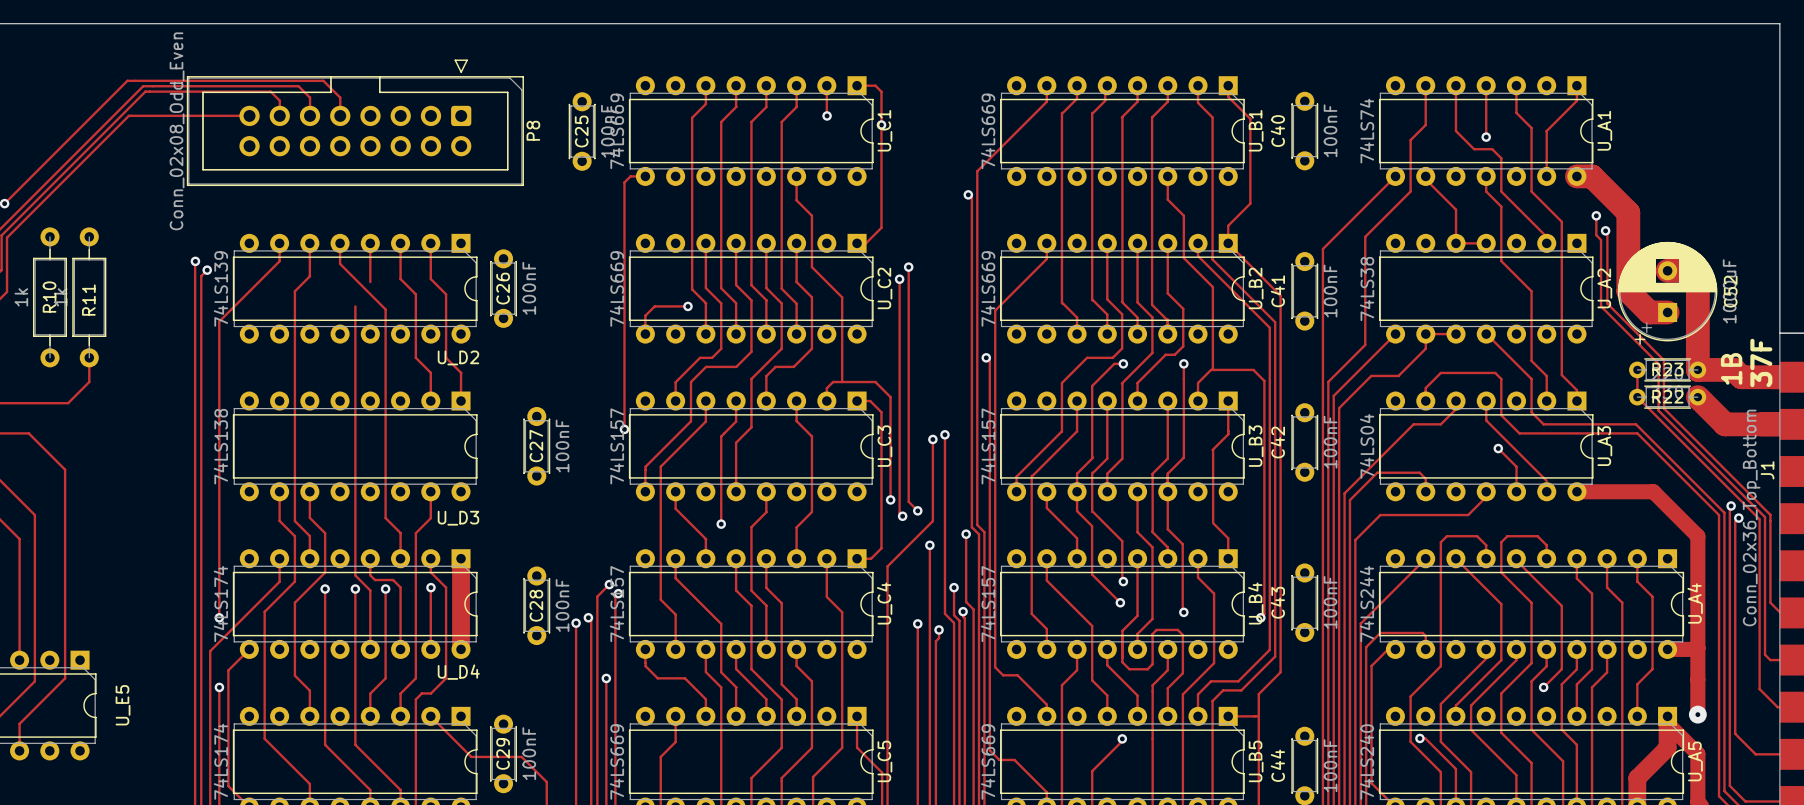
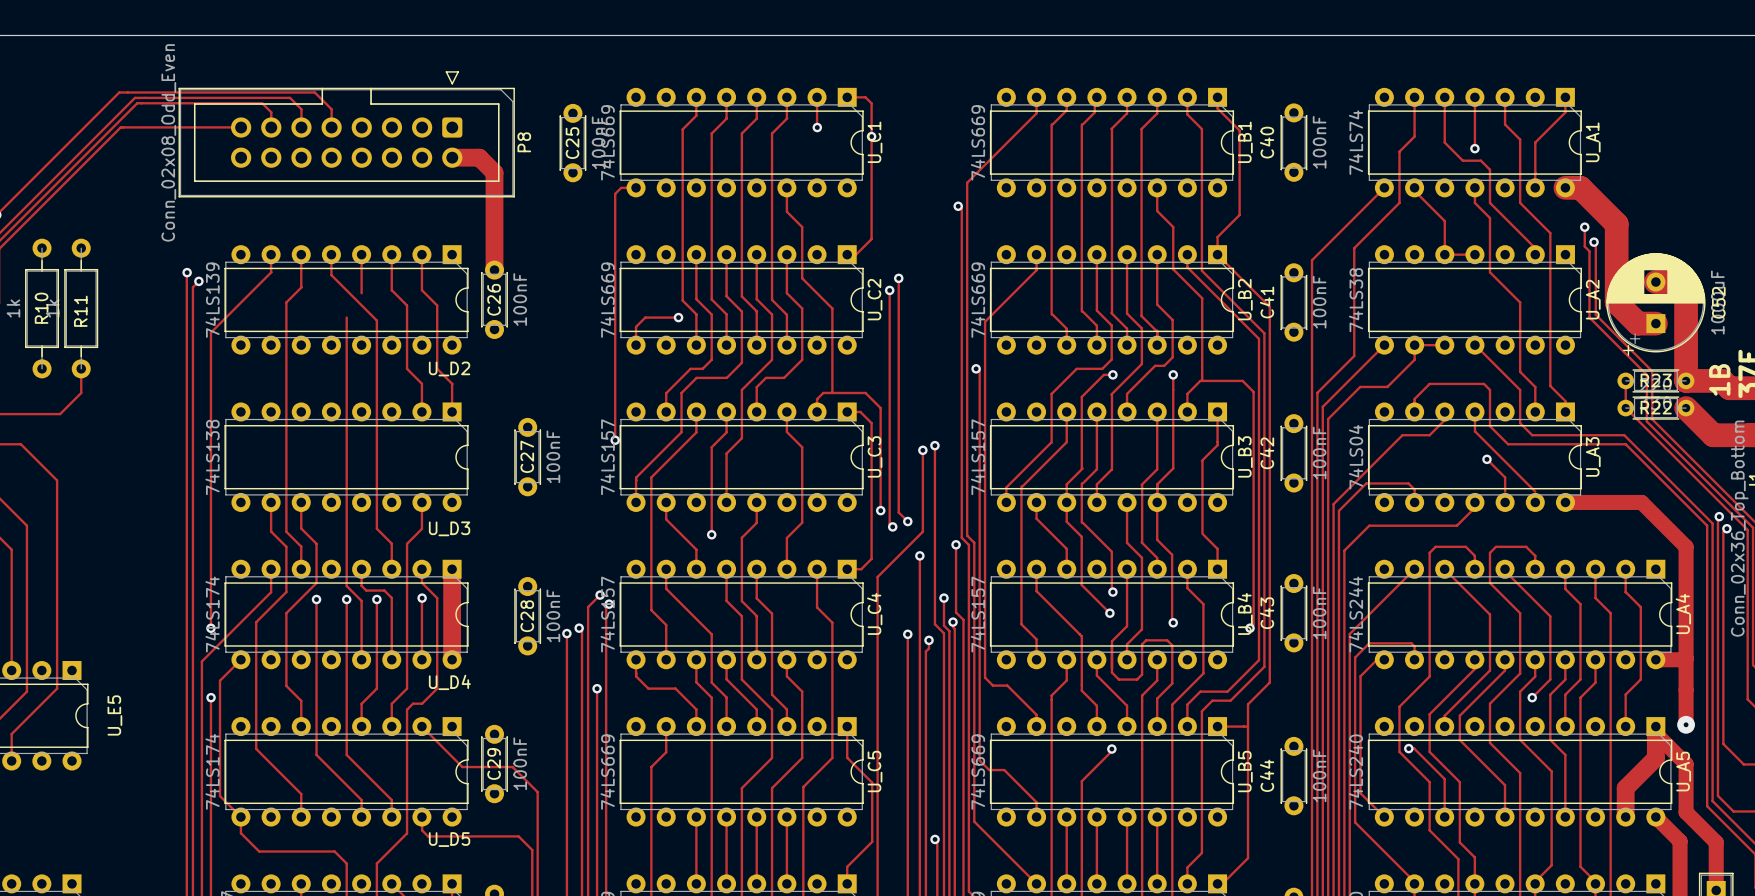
track: none -> (452, 157) (479, 157) (494, 172) (494, 270)

